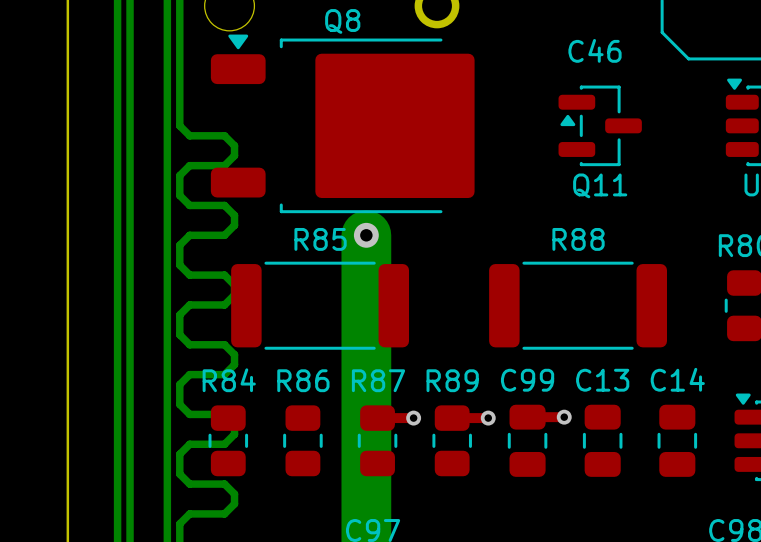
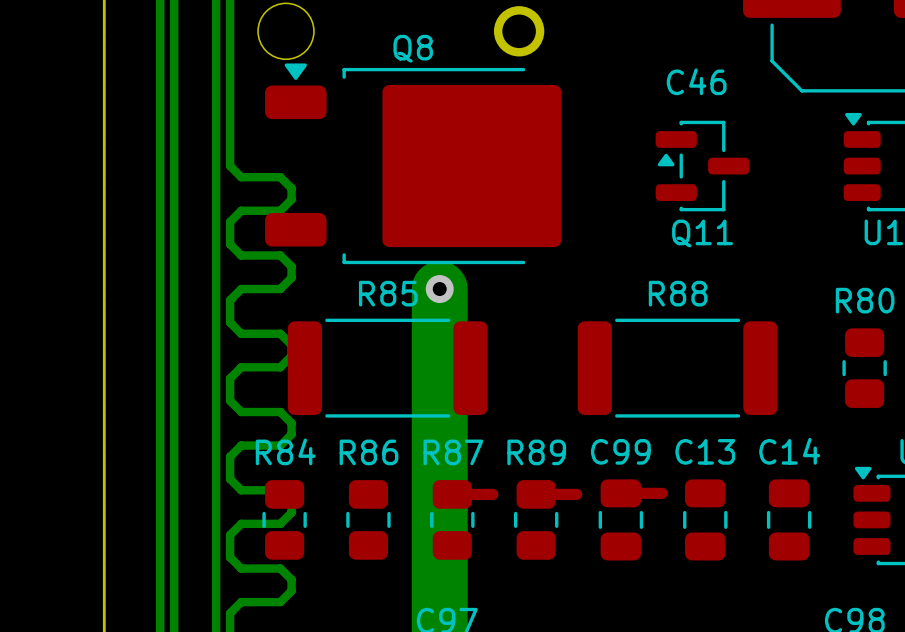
via: (564, 417) -> none
via: (413, 418) -> none
via: (488, 418) -> none

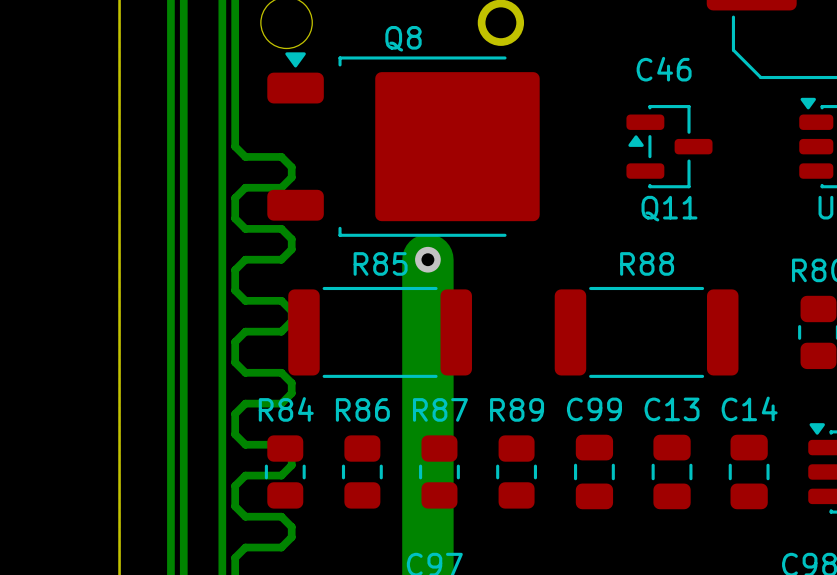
top track: (620, 493) (662, 493) -> none
top track: (452, 494) (492, 494) -> none
top track: (536, 494) (576, 494) -> none

